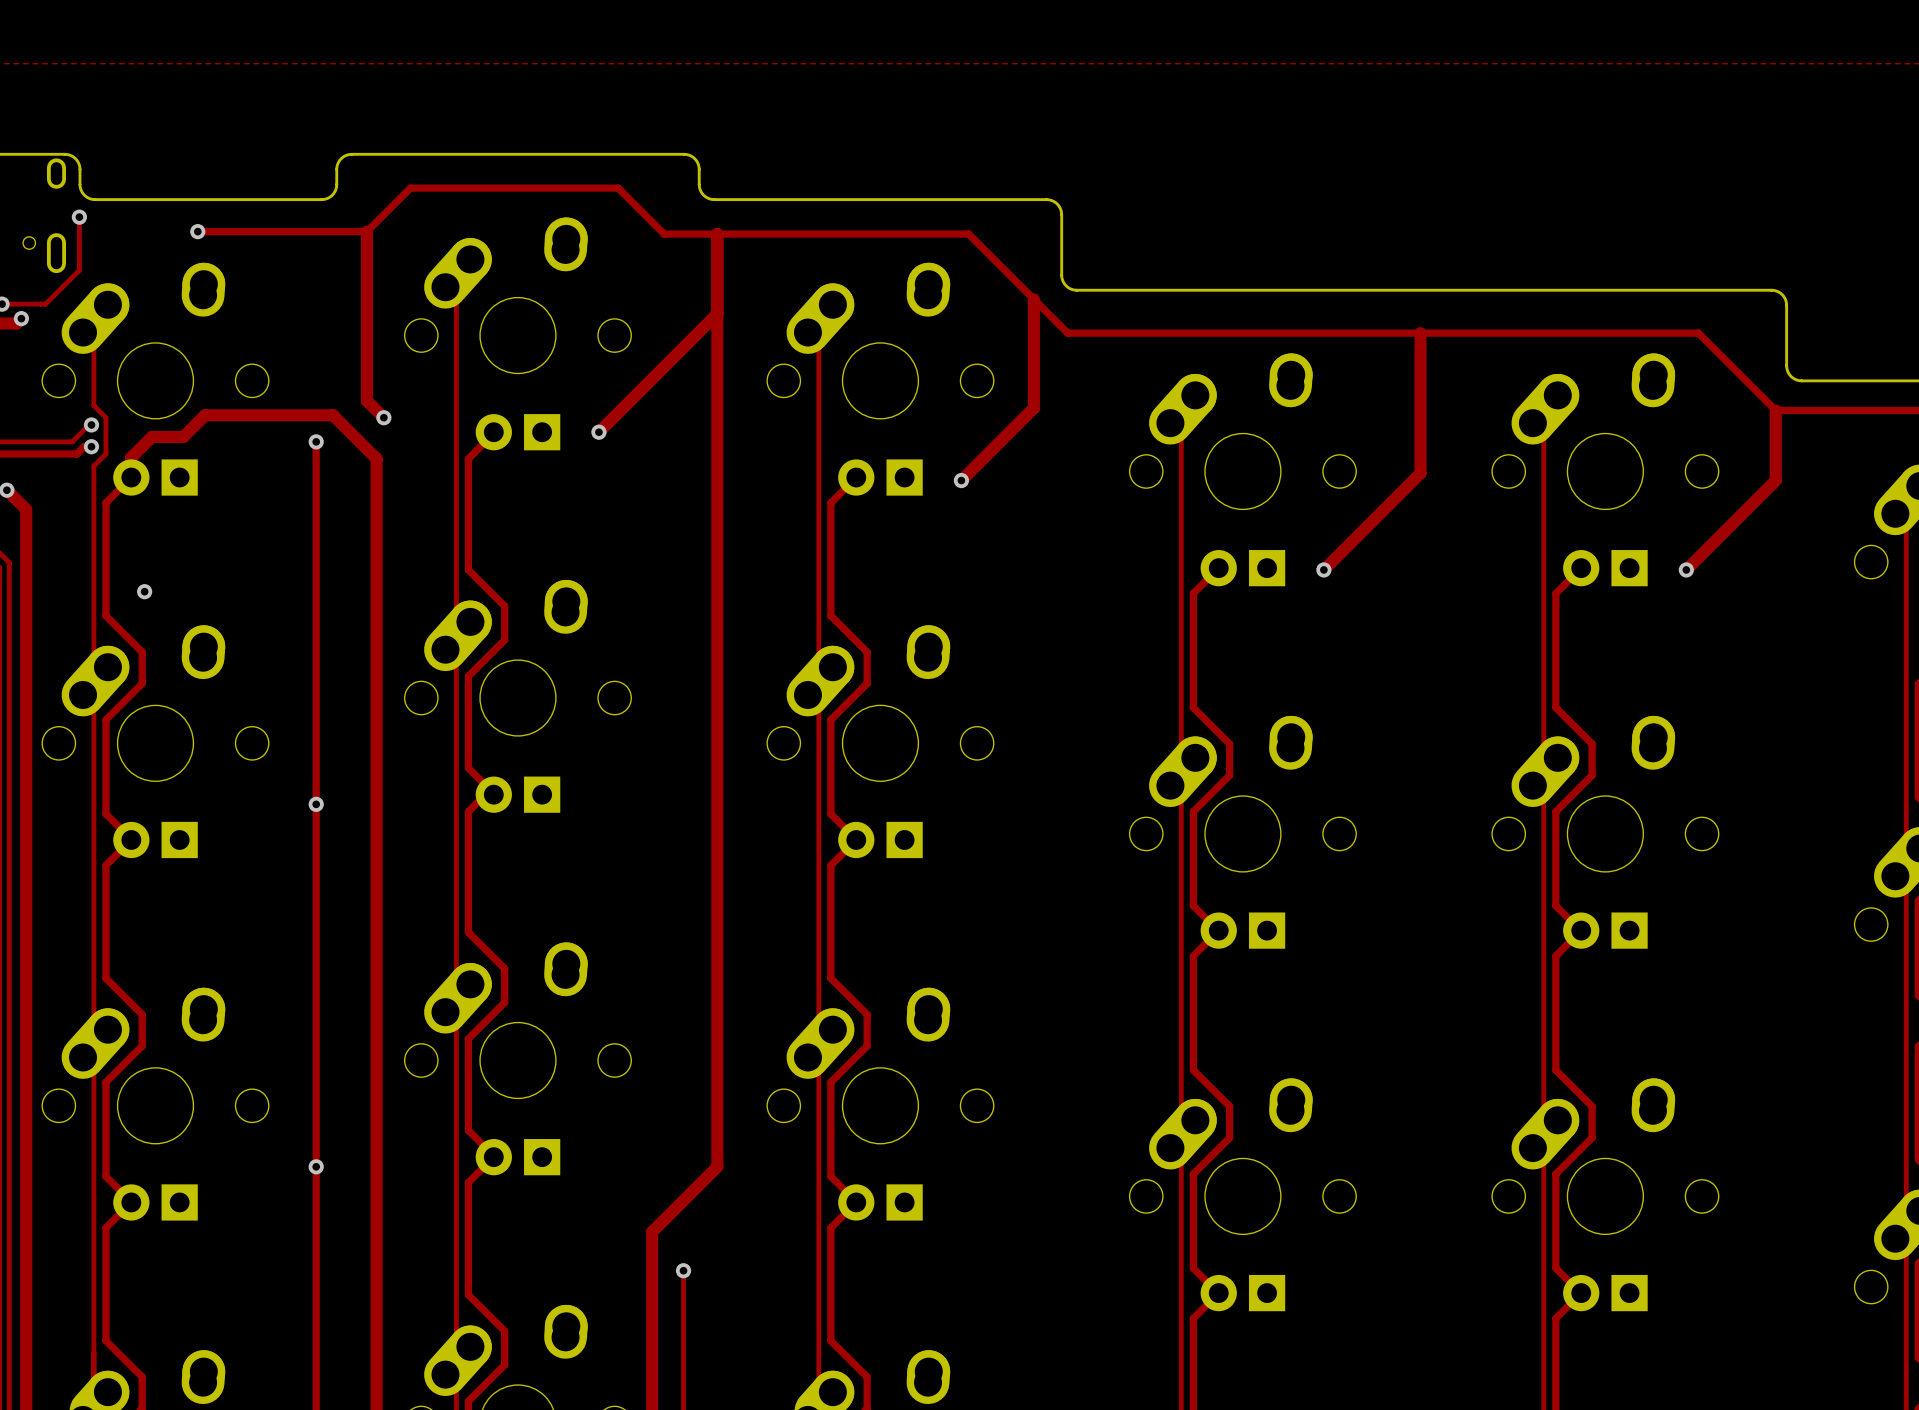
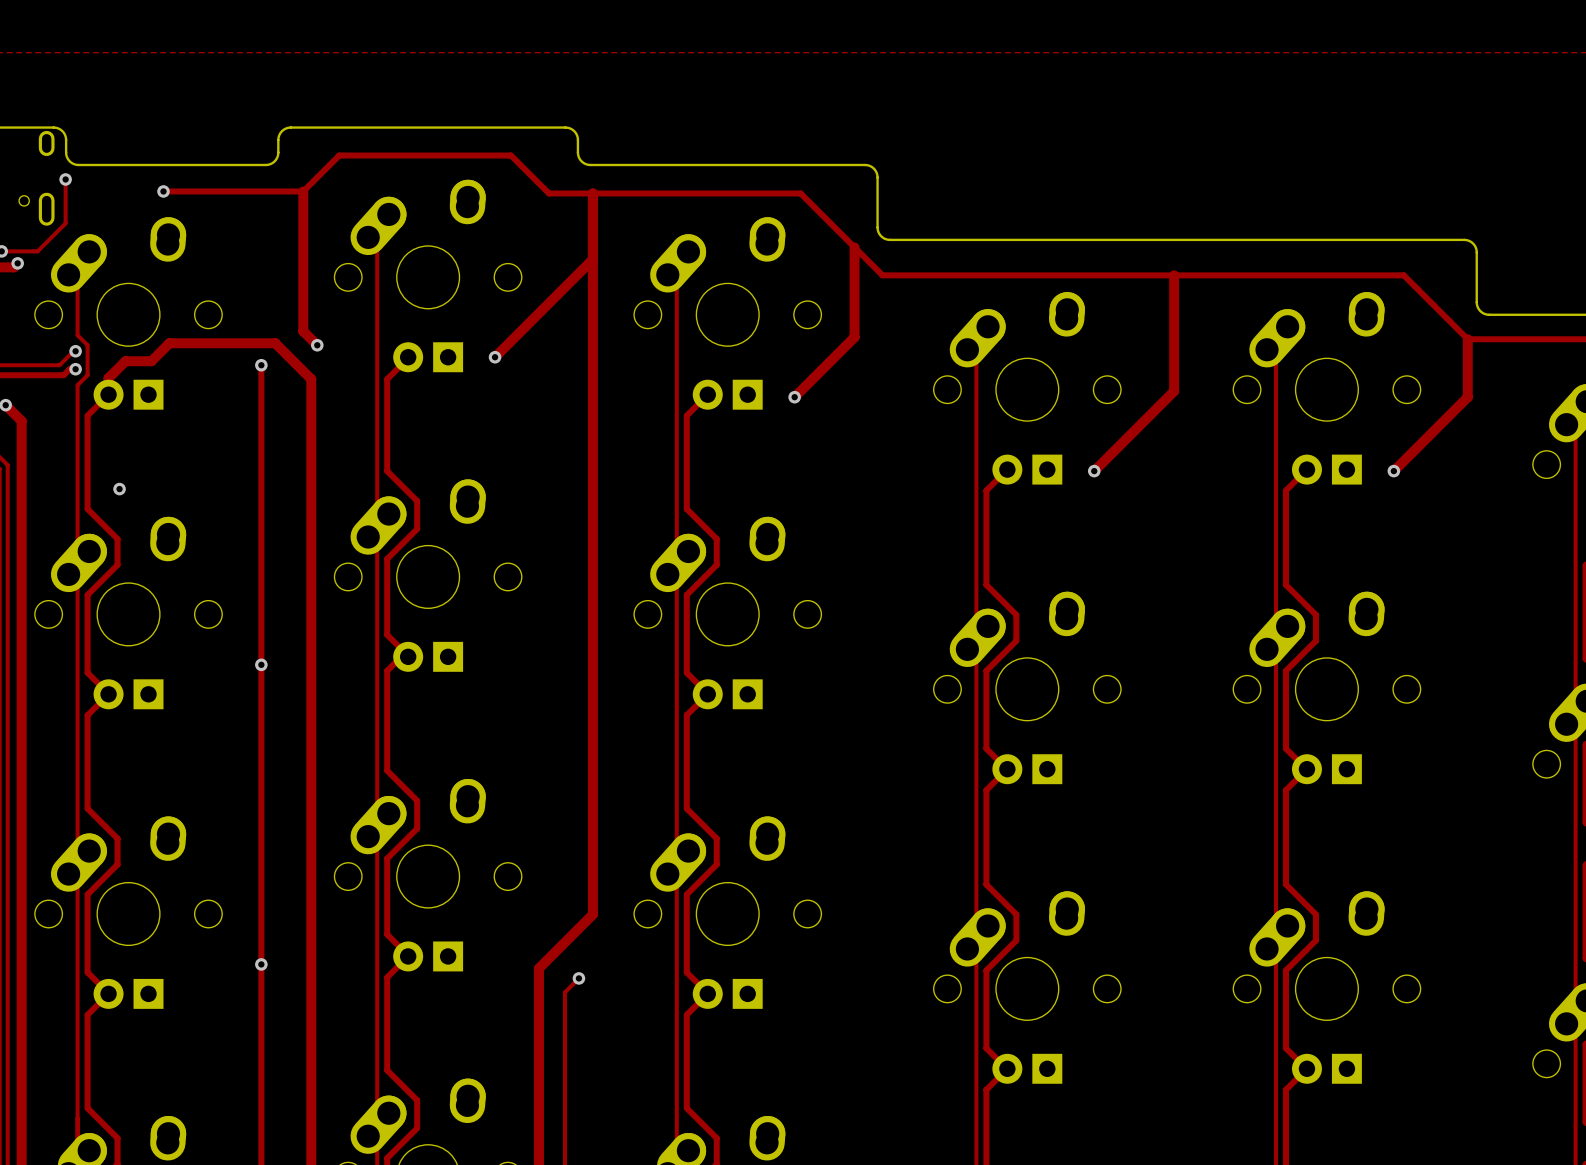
track: (717, 1106) (717, 1166) (700, 1183) -> (592, 914) (538, 968) (538, 1018)
track width: thick (700, 1183) (683, 1200) -> thin (578, 978) (564, 992)
track: (683, 1200) (652, 1232) -> (564, 992) (564, 1050)
via position: (683, 1270) -> (578, 978)

